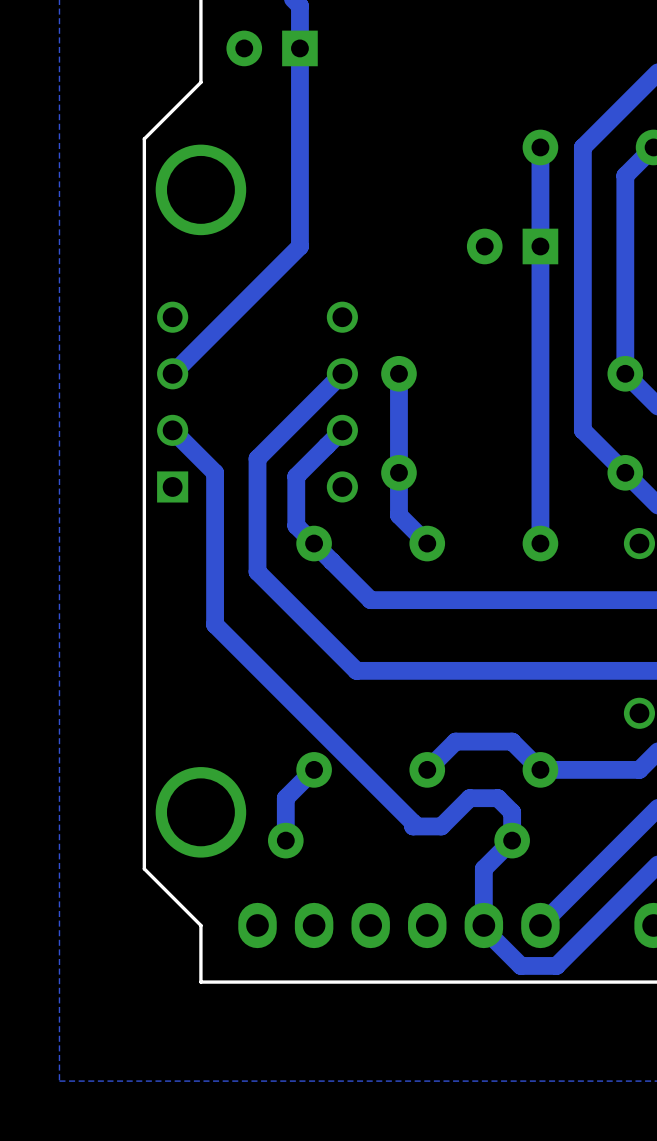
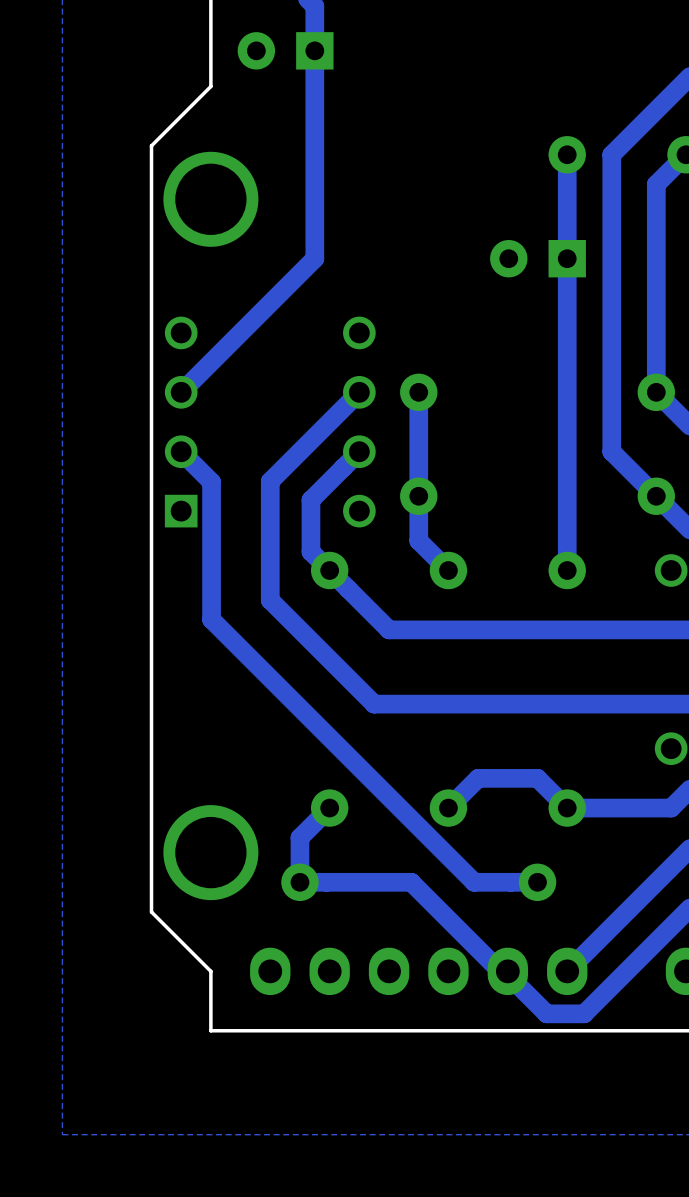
track: (201, 459) (215, 472) (215, 624) (413, 822) (413, 826) (441, 826) (469, 798) (497, 798) (512, 812) (512, 840) (483, 868) (483, 925) -> (211, 482) (211, 619) (474, 882) (537, 882)
track: none -> (299, 882) (411, 882) (500, 971) (507, 971)

